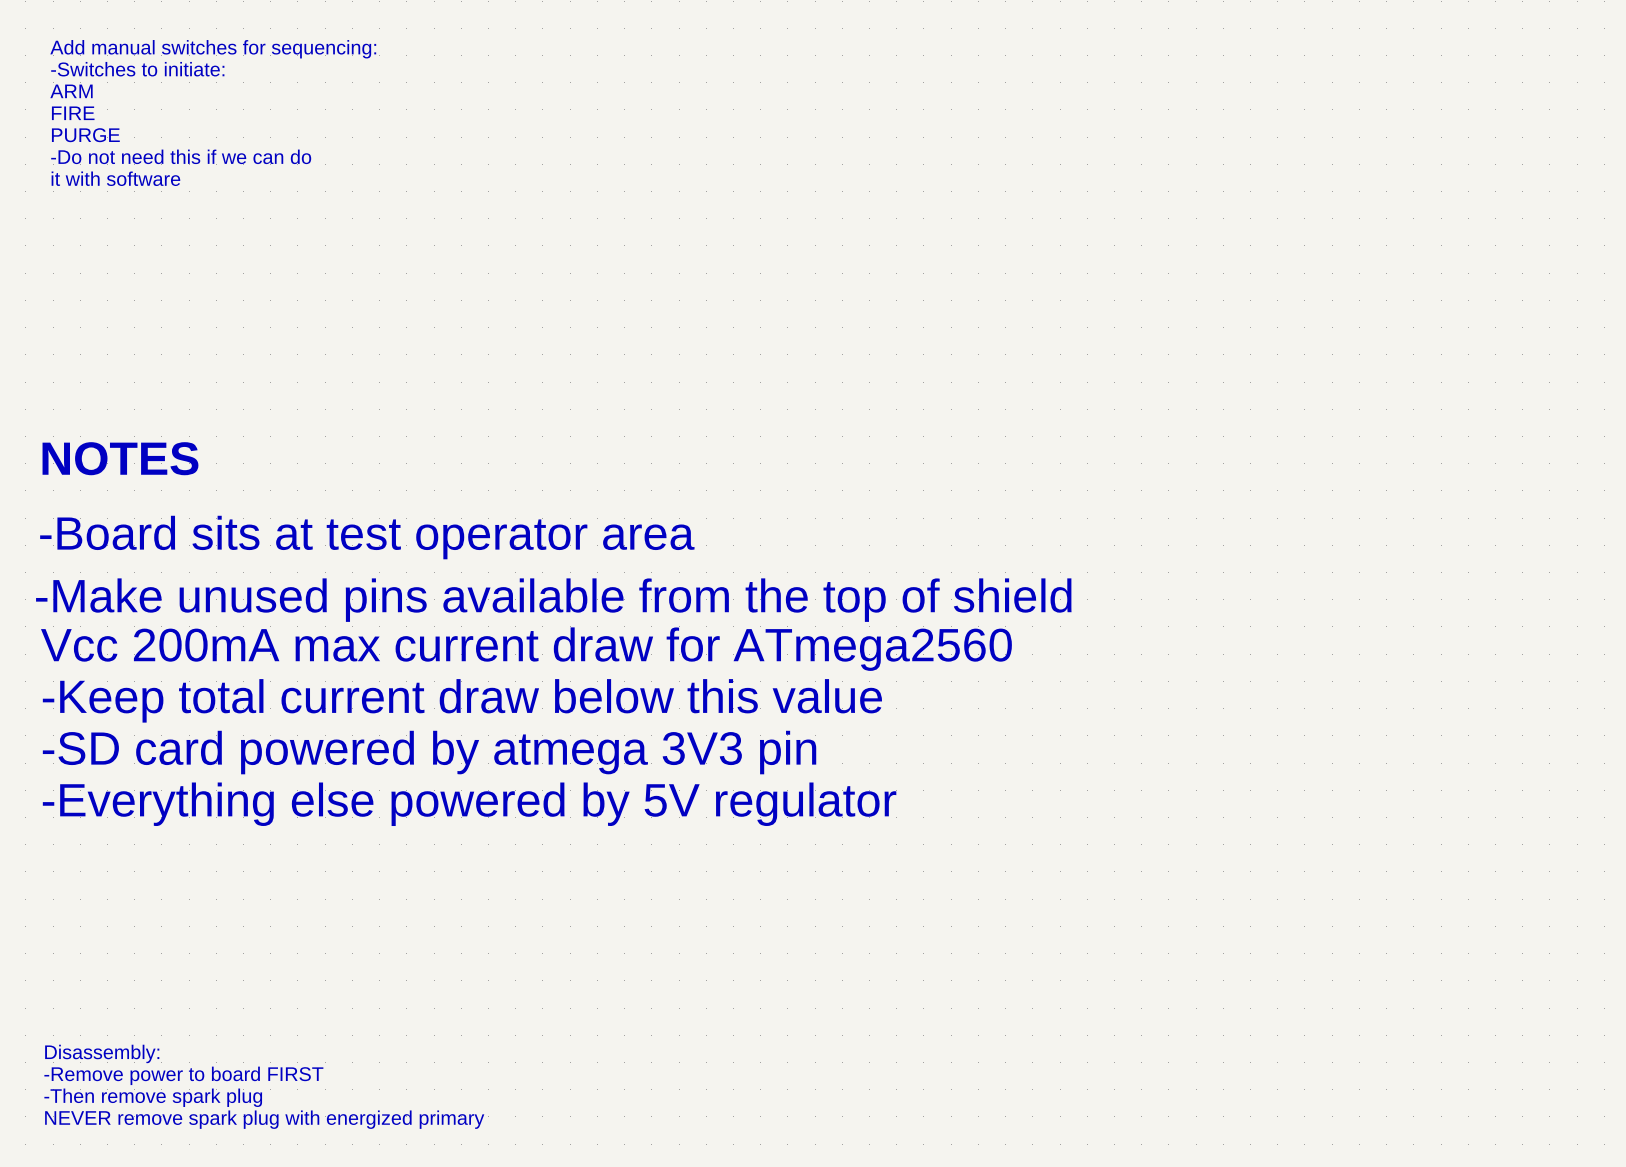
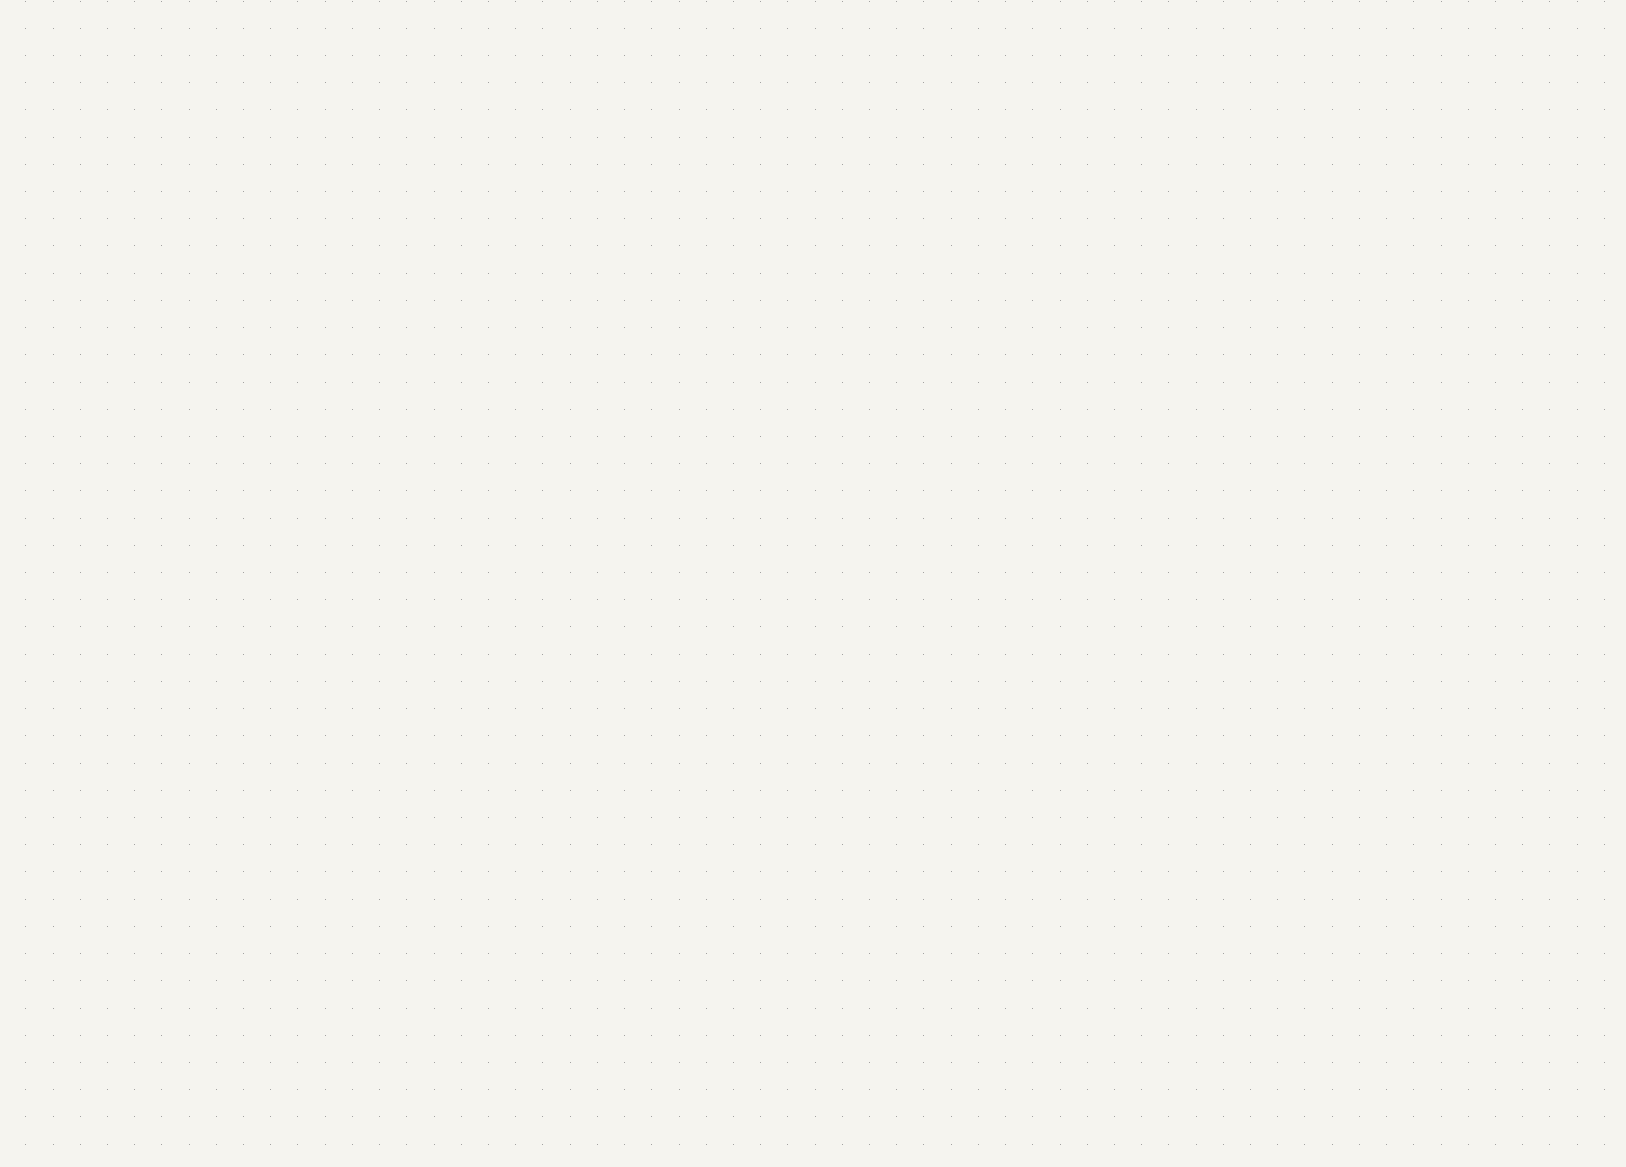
text: Add manual switches for sequencing: (213, 49) -> none
text: -Switches to initiate: (137, 69) -> none
text: ARM (71, 91) -> none
text: FIRE (73, 113) -> none
text: PURGE (85, 135) -> none
text: -Do not need this if we can do (181, 156) -> none
text: it with software (115, 178) -> none
text: NOTES (120, 458) -> none
text: -Board sits at test operator area (367, 537) -> none
text: -Make unused pins available from the top of shield (553, 600) -> none
text: Vcc 200mA max current draw for ATmega2560 (526, 649) -> none
text: -Keep total current draw below this value (462, 700) -> none
text: -SD card powered by atmega 3V3 pin (429, 752) -> none
text: -Everything else powered by 5V regulator (469, 804) -> none
text: Disassembly: (102, 1053) -> none
text: -Remove power to board FIRST (183, 1075) -> none
text: -Then remove spark plug (153, 1097) -> none
text: NEVER remove spark plug with energized primary (264, 1119) -> none

